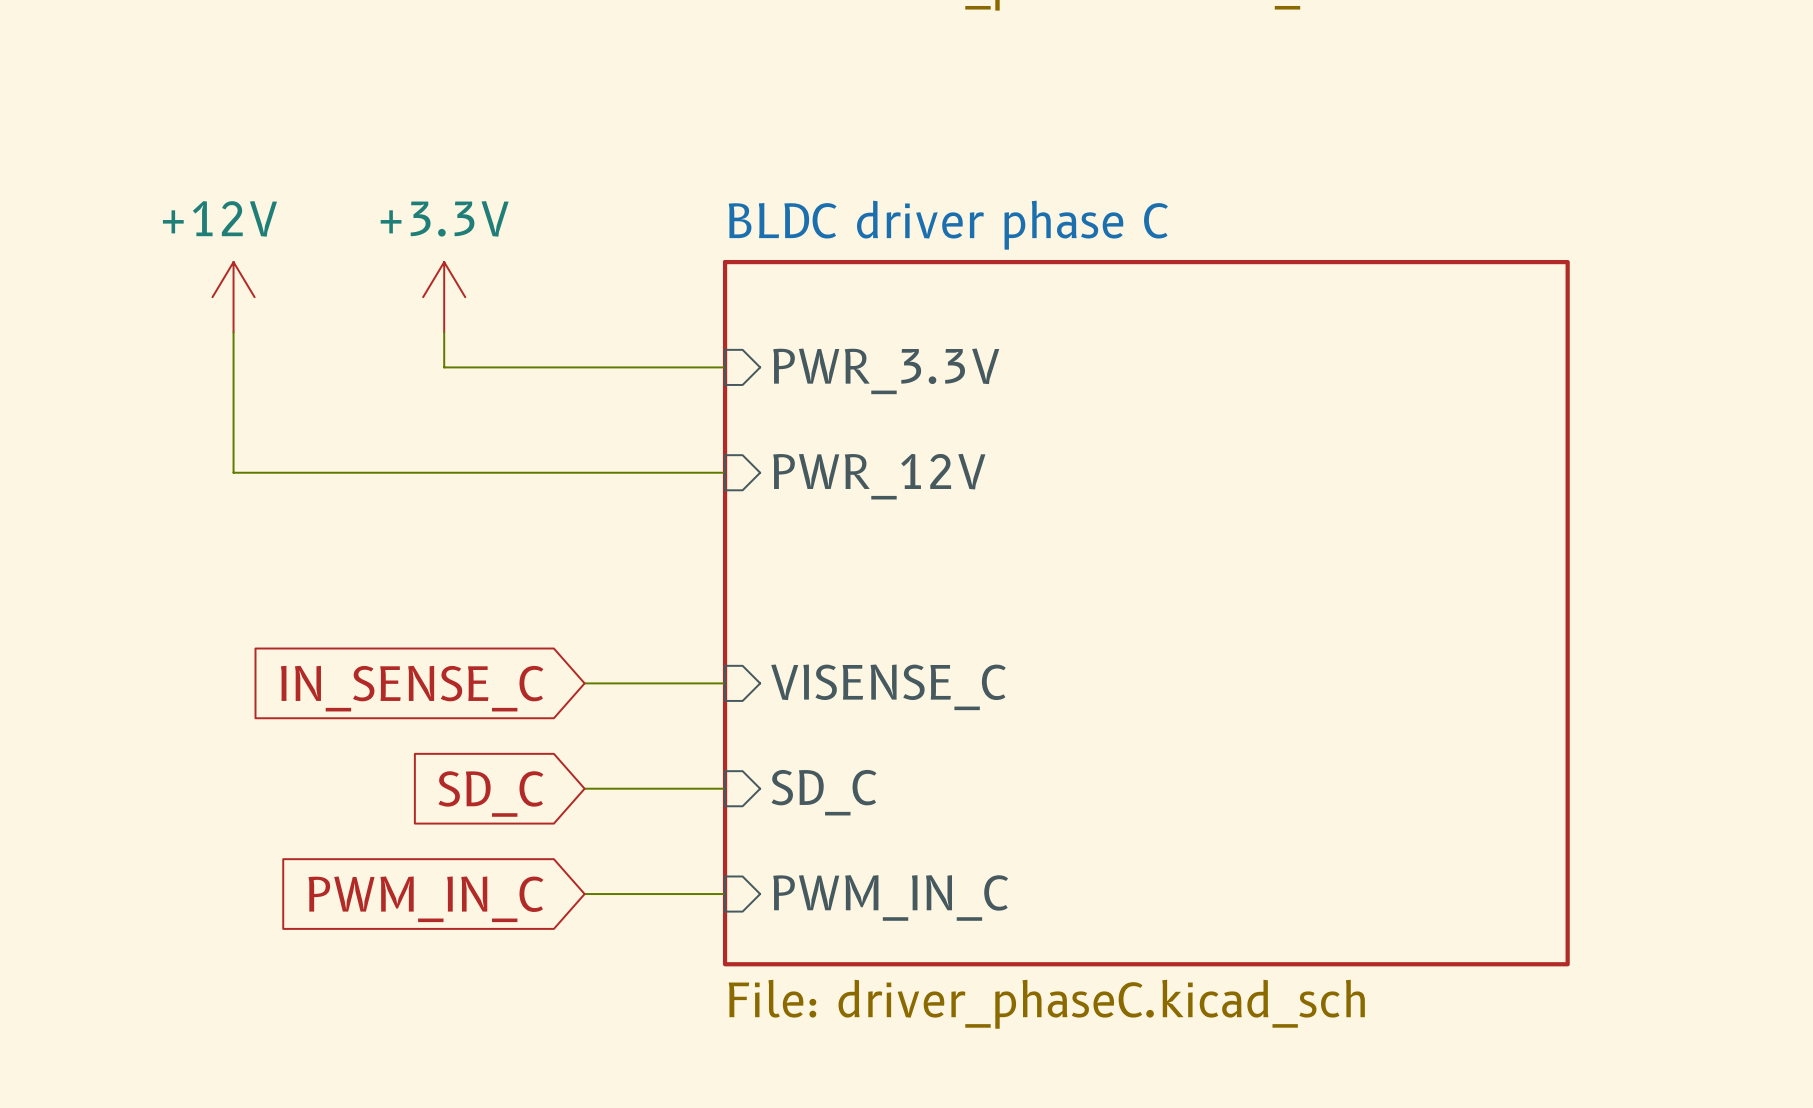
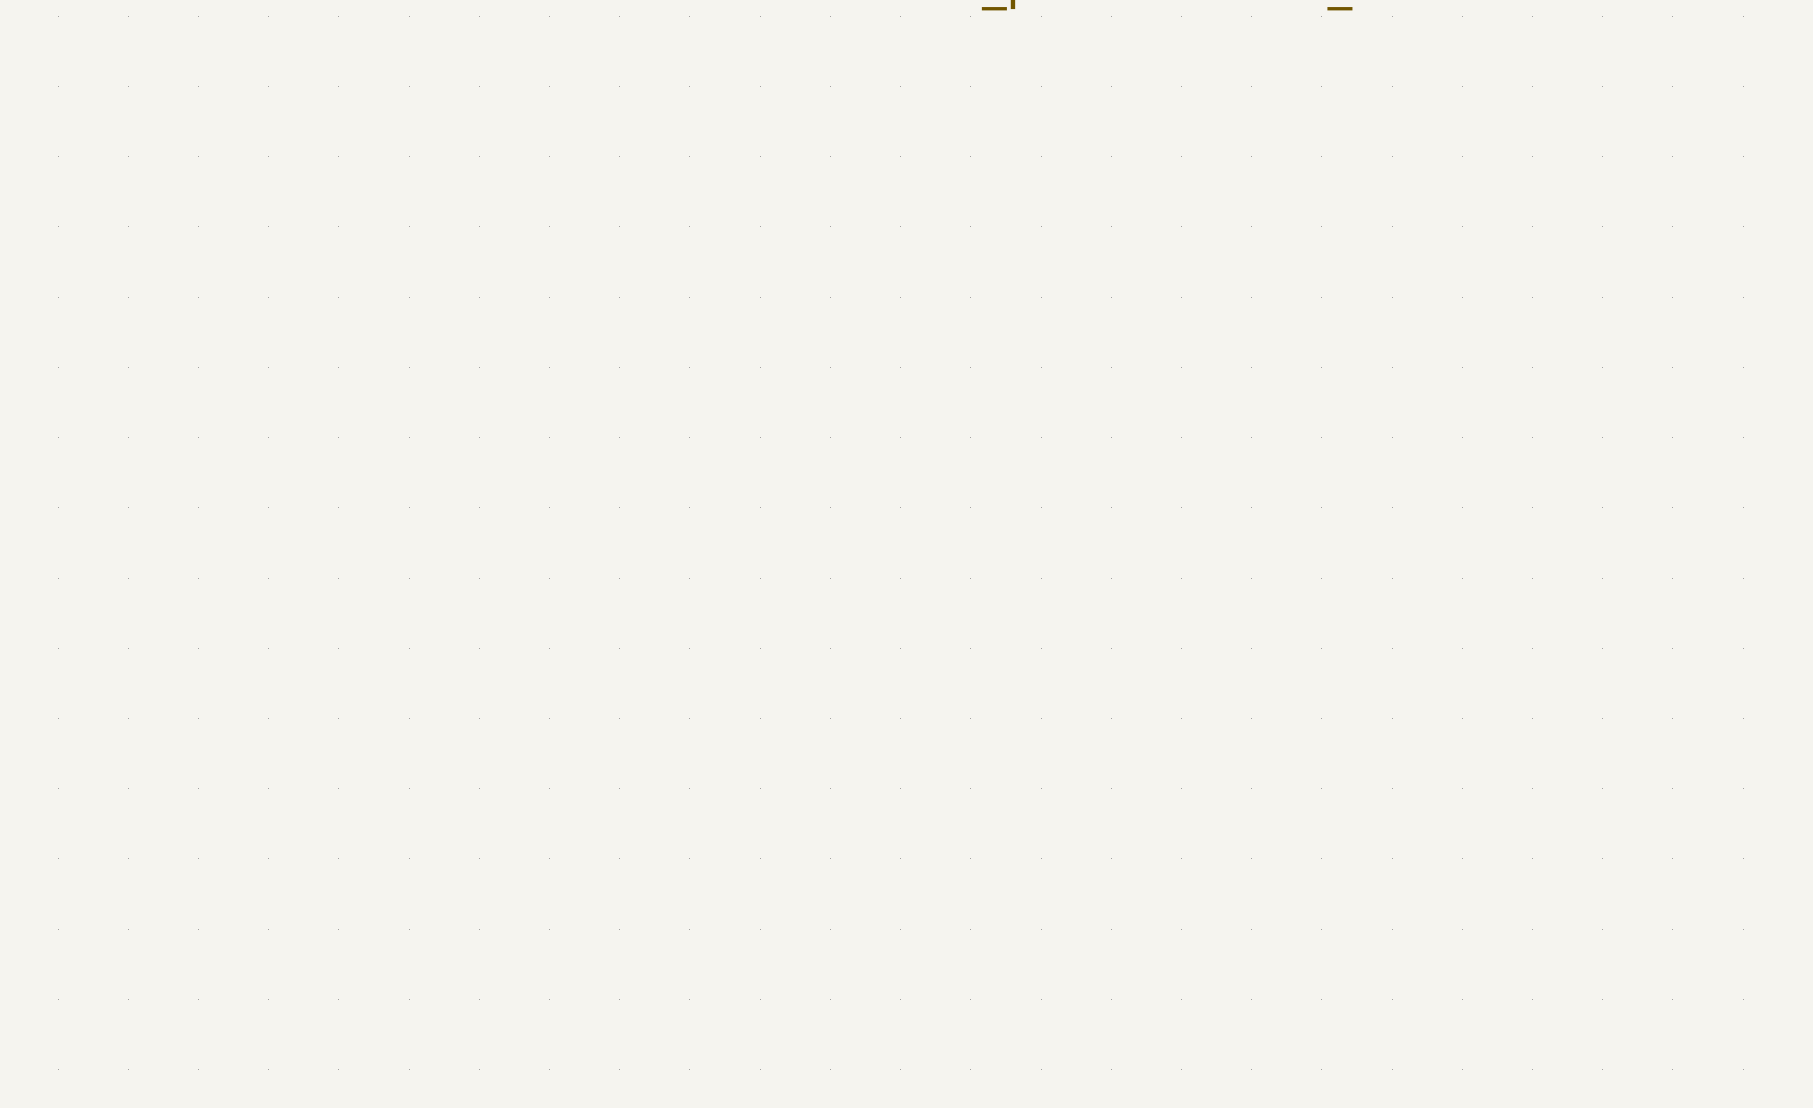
power symbol: +12V (233, 297) -> none
power symbol: +3.3V (444, 297) -> none
wire: (233, 332) (233, 472) (725, 472) -> none
wire: (444, 332) (444, 367) (725, 367) -> none
sheet pin: PWR_3.3V (886, 371) -> none
sheet pin: PWR_12V (879, 476) -> none
sheet BLDC driver phase C: File: driver_phaseC.kicad_sch (1146, 613) -> none
wire: (584, 683) (725, 683) -> none
sheet pin: VISENSE_C (888, 687) -> none
global label: IN_SENSE_C (412, 688) -> none
wire: (584, 788) (725, 788) -> none
sheet pin: SD_C (823, 792) -> none
global label: SD_C (490, 794) -> none
wire: (584, 894) (725, 894) -> none
sheet pin: PWM_IN_C (890, 897) -> none
global label: PWM_IN_C (425, 899) -> none

